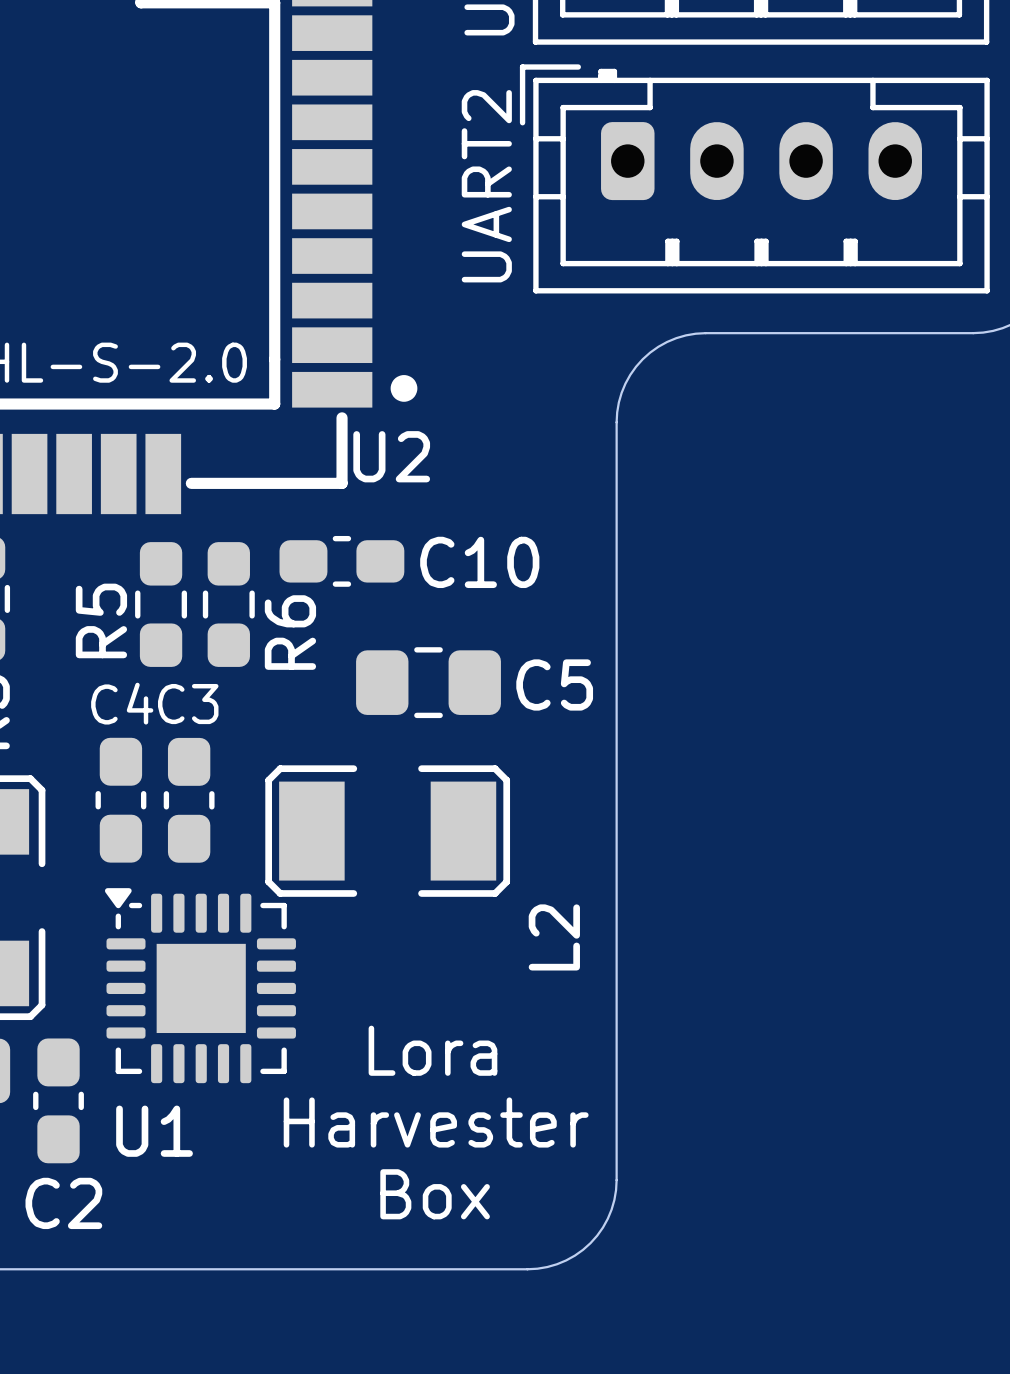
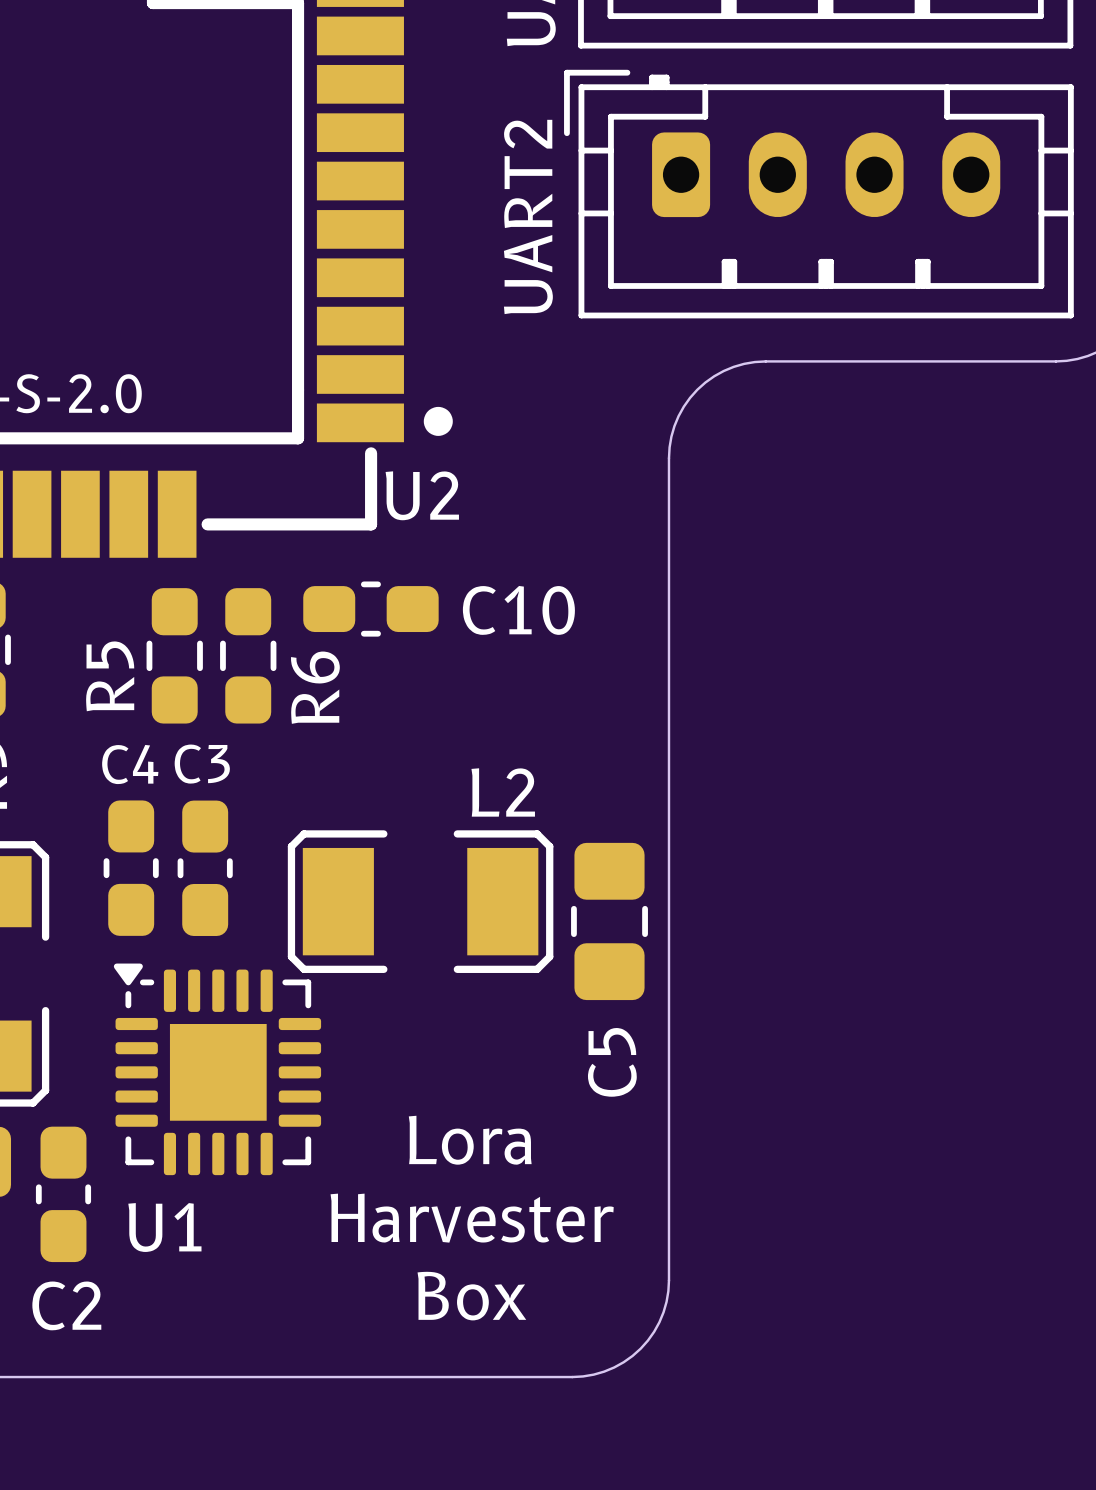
C5 rotation: 0° (428, 682) -> 90° clockwise (609, 921)
C5 position: (428, 682) -> (609, 921)
L2 name rotation: 0° (554, 937) -> 90° clockwise (503, 792)
L2 name position: L2 (554, 937) -> L2 (503, 792)

